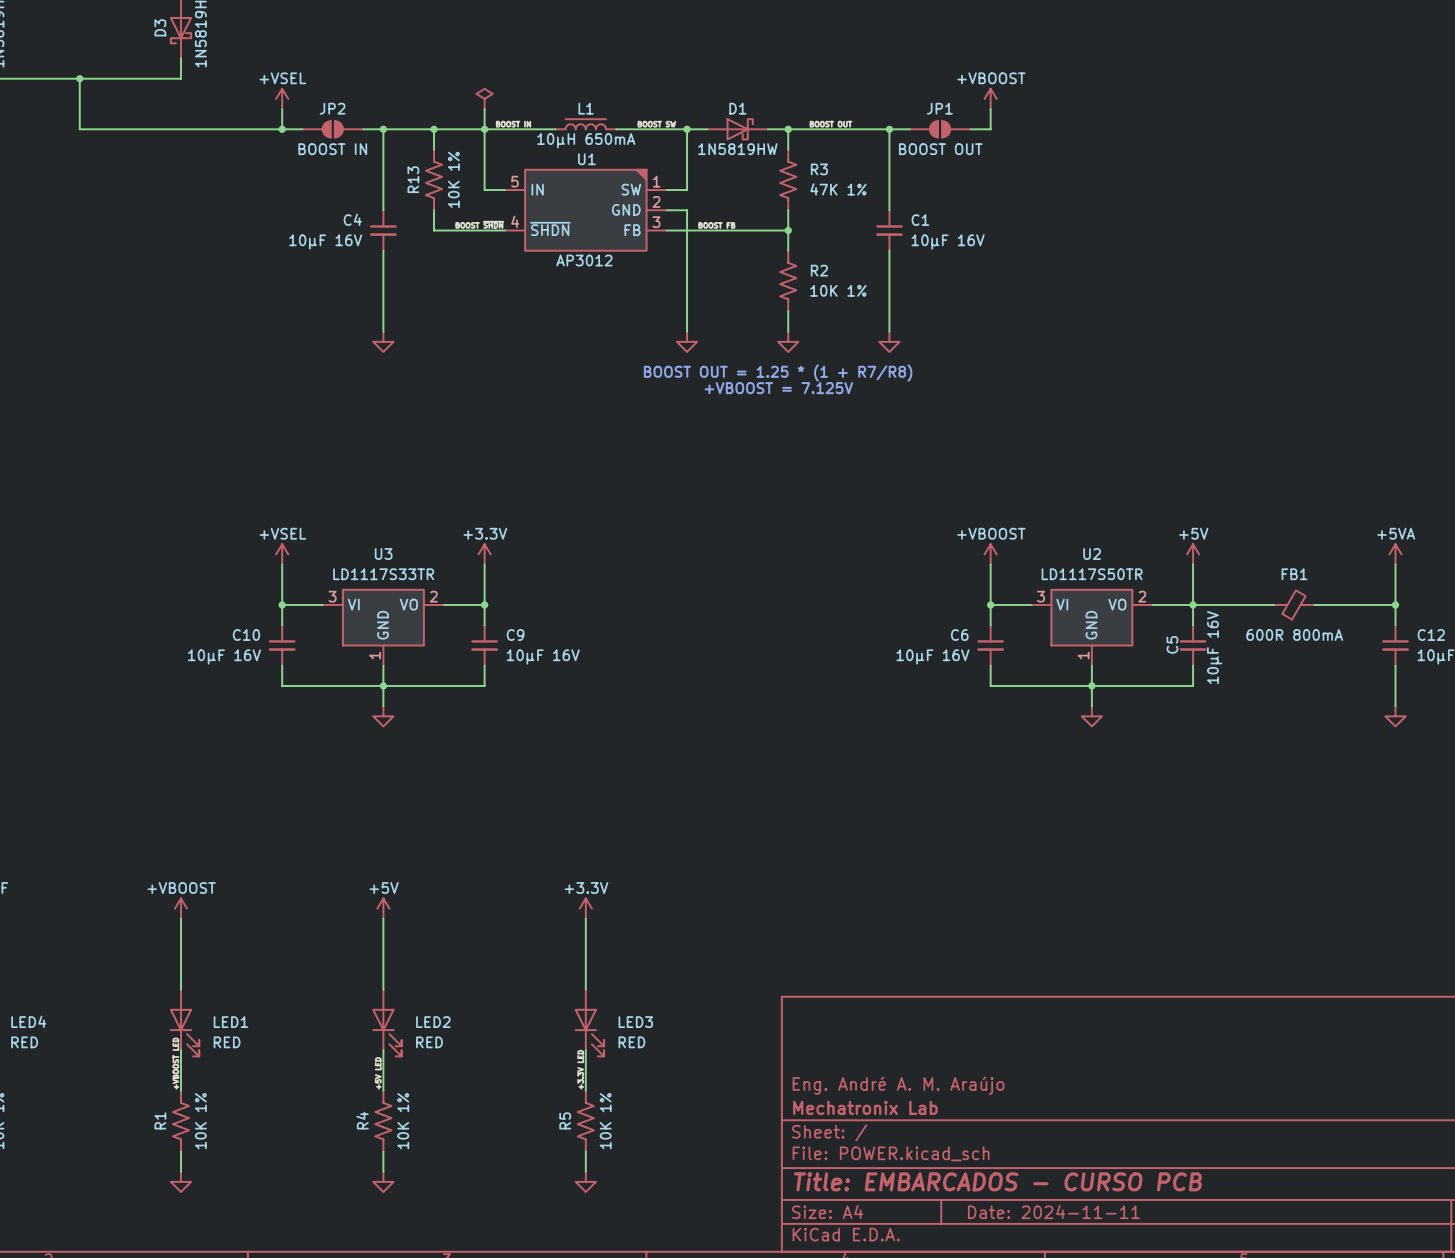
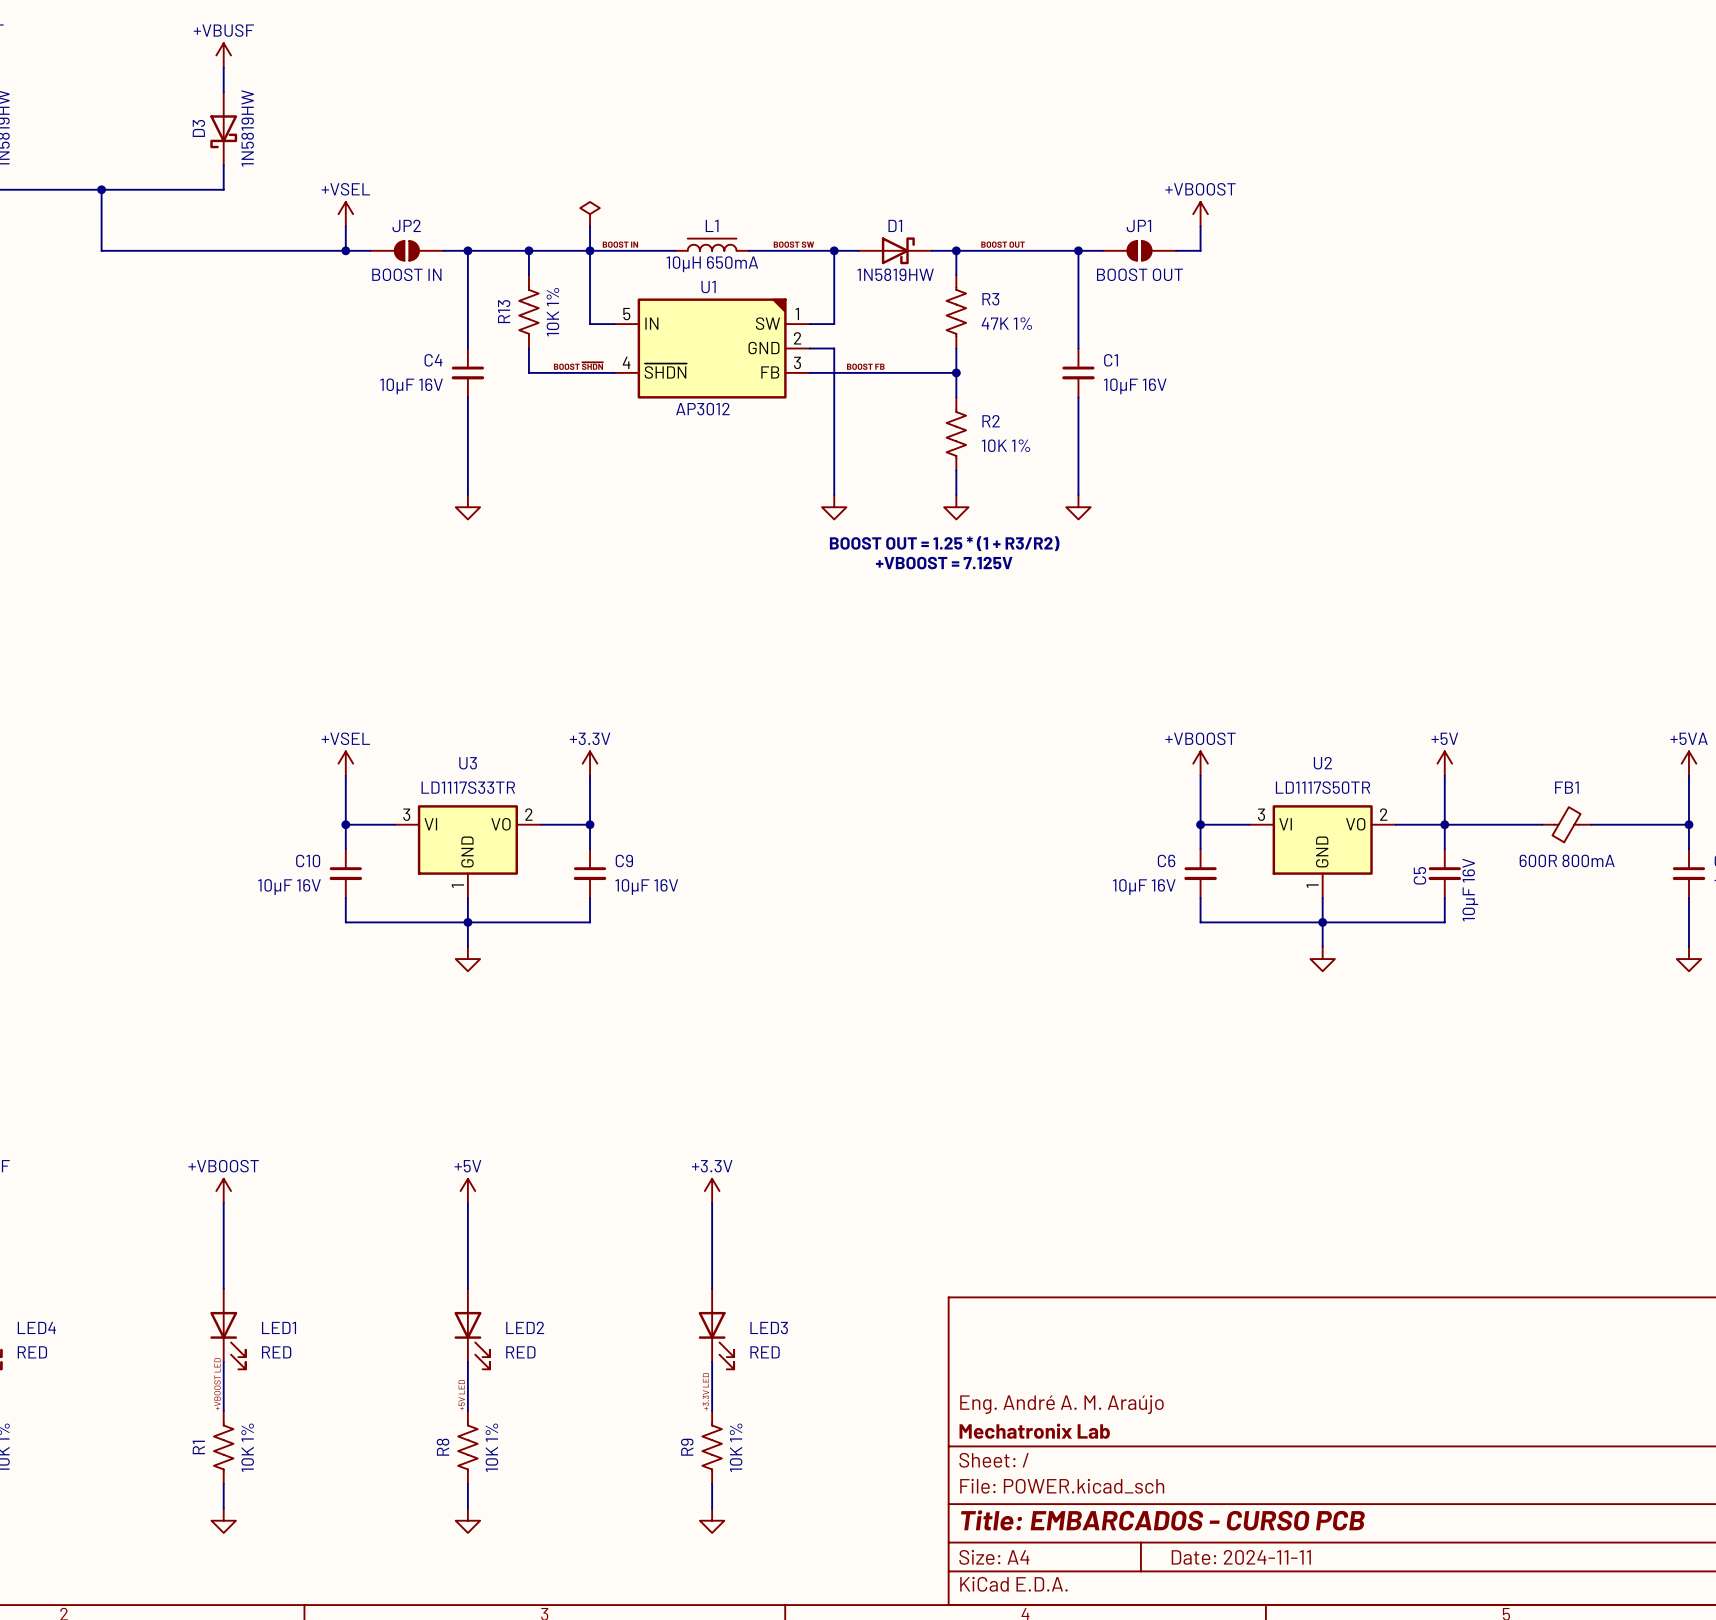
text: BOOST OUT = 1.25 * (1 + R7/R8) (778, 373) -> BOOST OUT = 1.25 * (1 + R3/R2) (944, 543)
R4 name: R4 (362, 1120) -> R8 (443, 1447)
R5 name: R5 (565, 1120) -> R9 (687, 1447)

